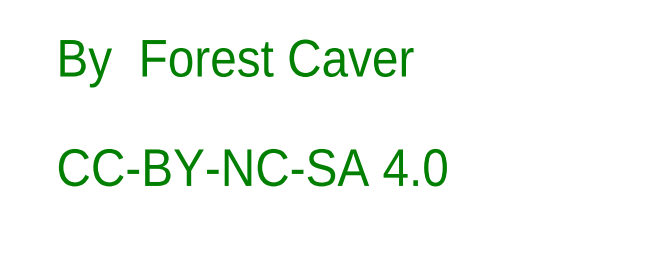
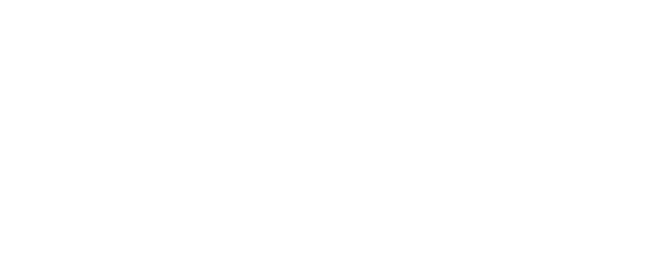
text: By Forest Caver (236, 63) -> none
text: CC-BY-NC-SA 4.0 (252, 167) -> none

